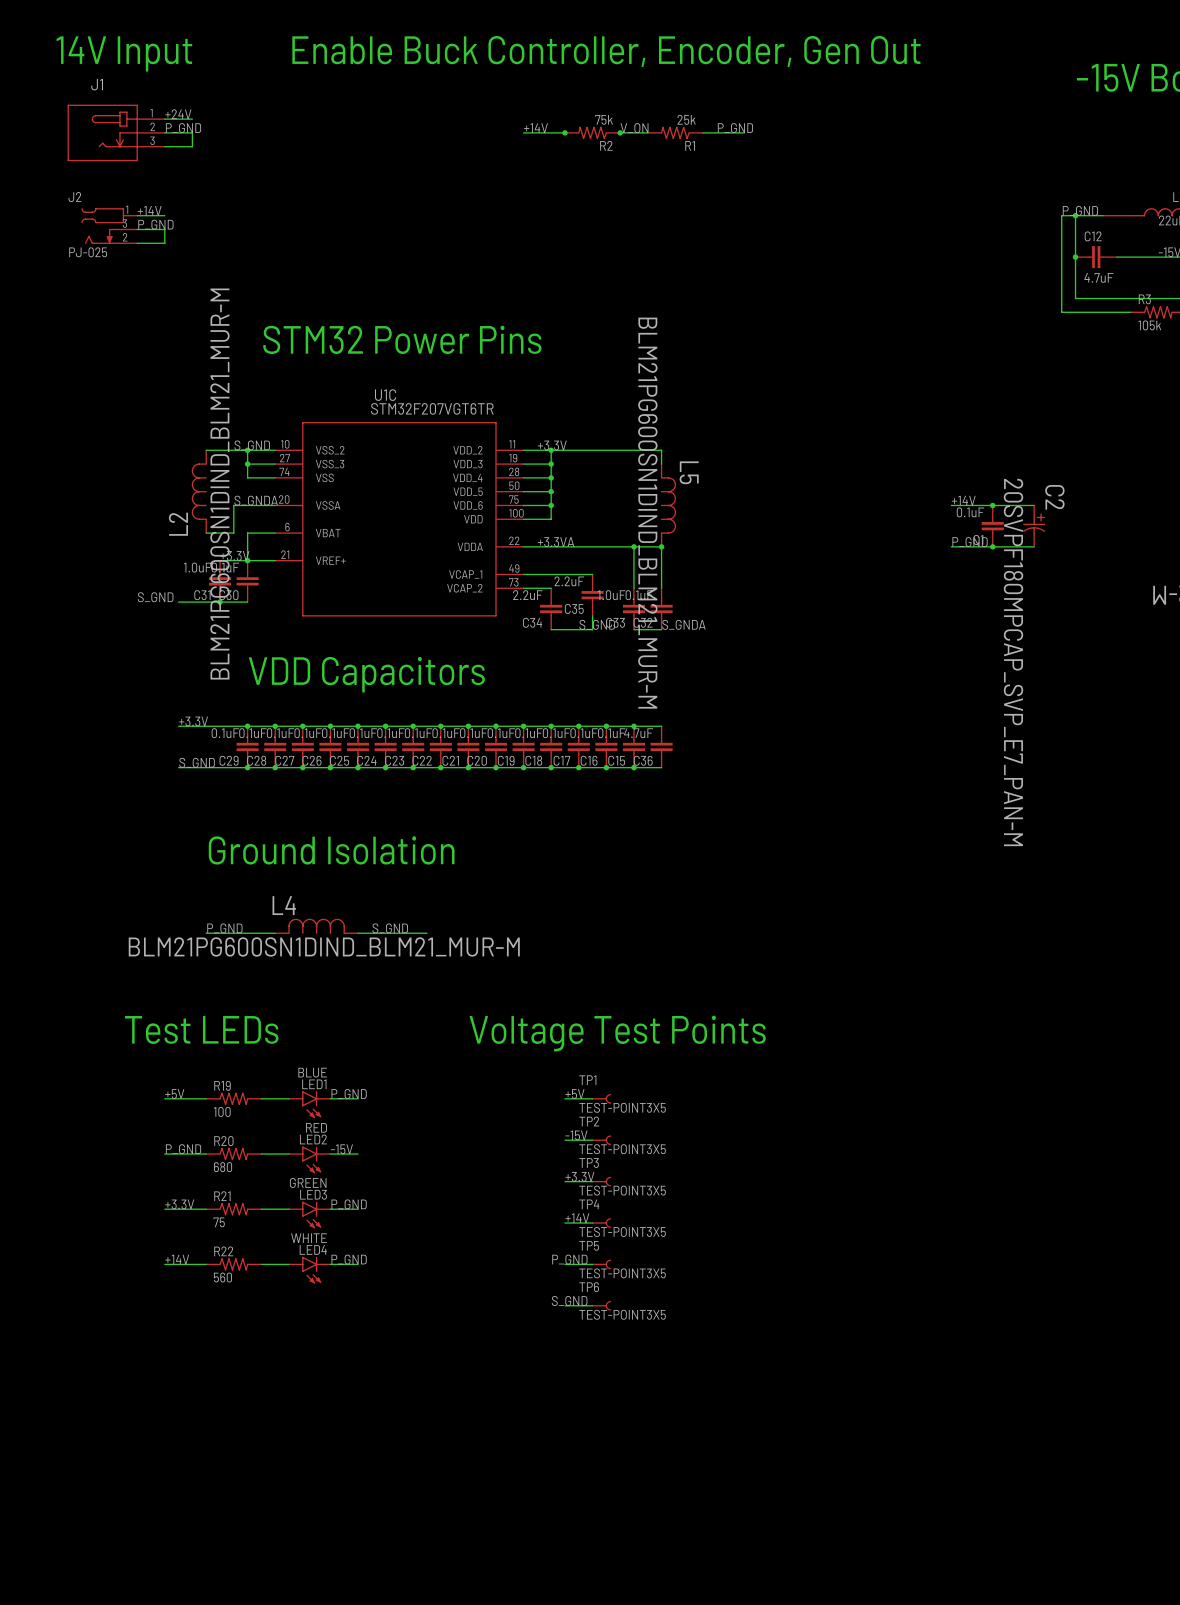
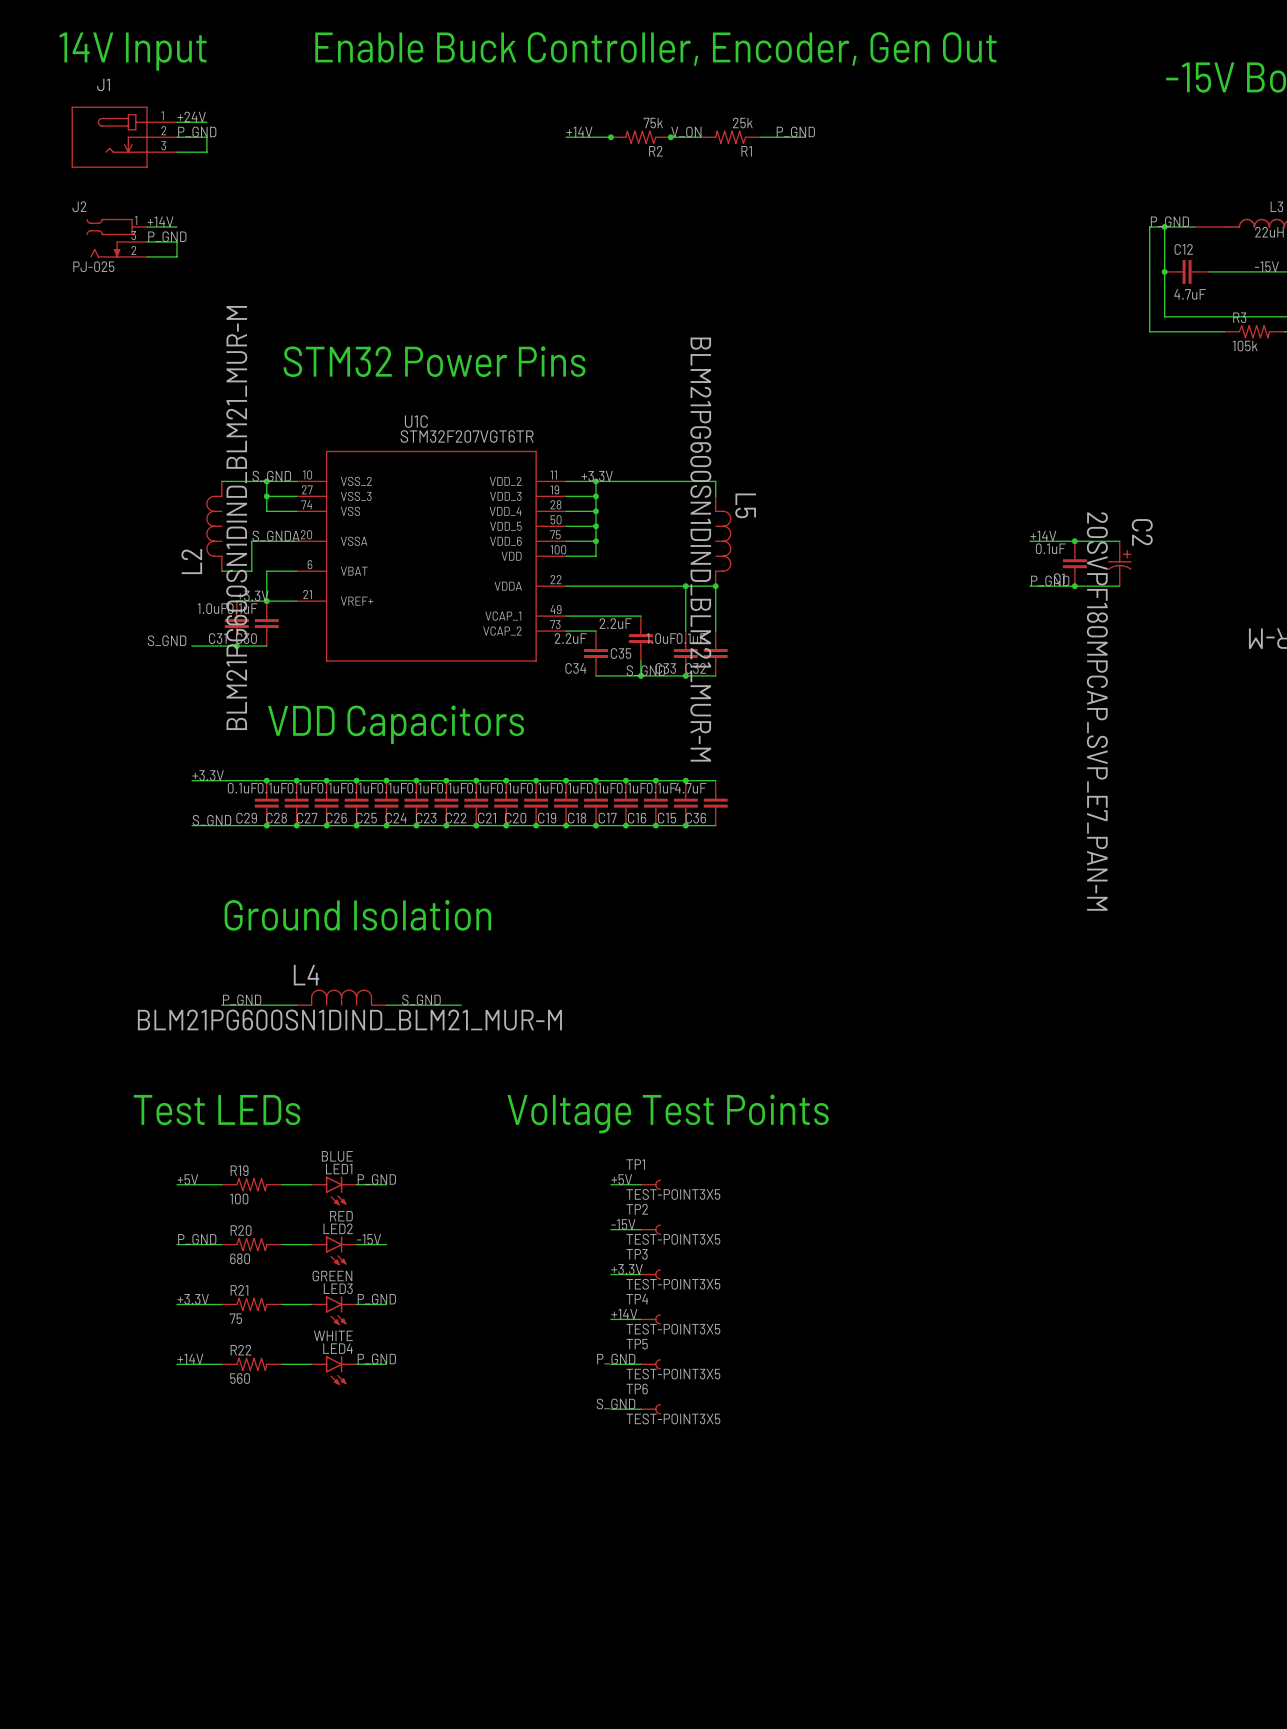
label: +3.3VA (556, 542) -> none
label: S_GNDA (683, 624) -> none
wire: none -> (640, 675) (685, 675)
junction: none -> (640, 675)
junction: none -> (685, 675)

